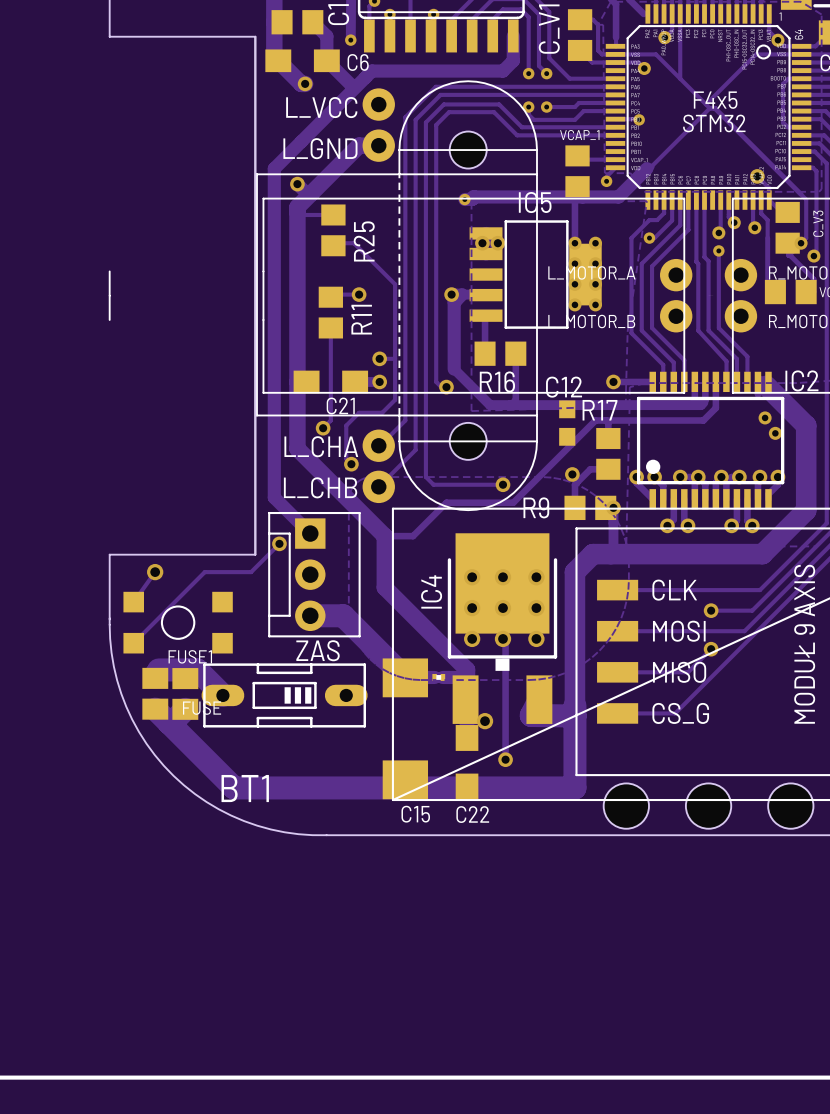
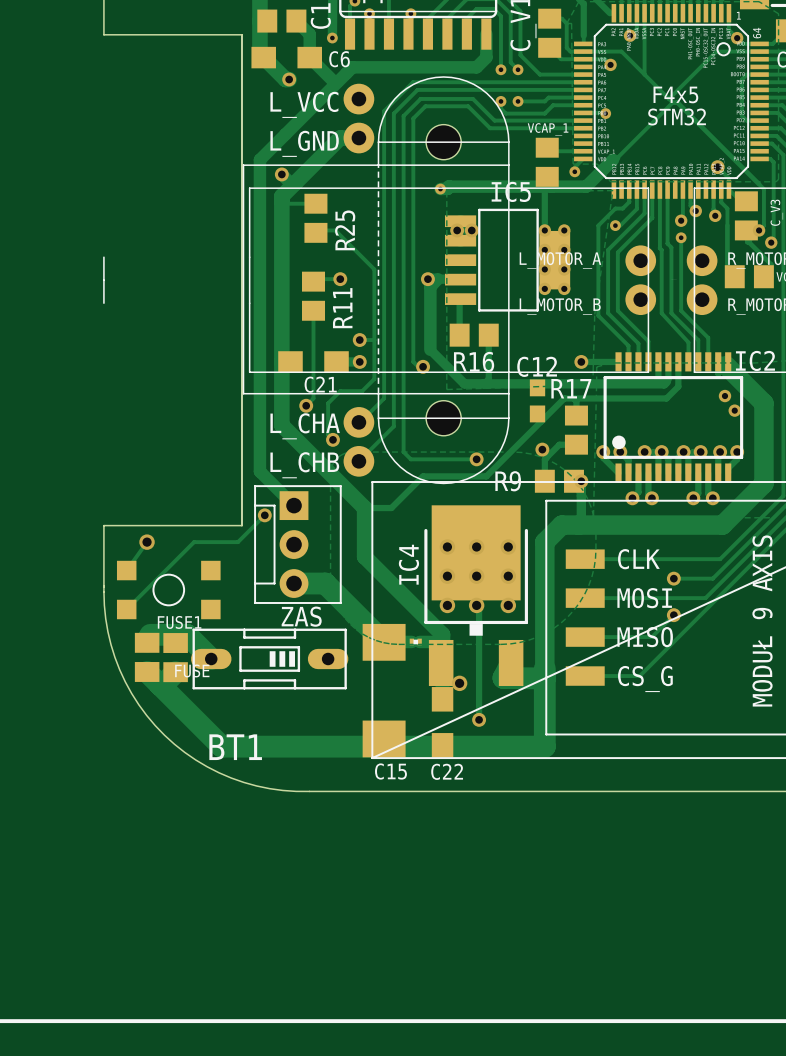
hole: (626, 806) -> none
hole: (708, 806) -> none
hole: (790, 806) -> none

